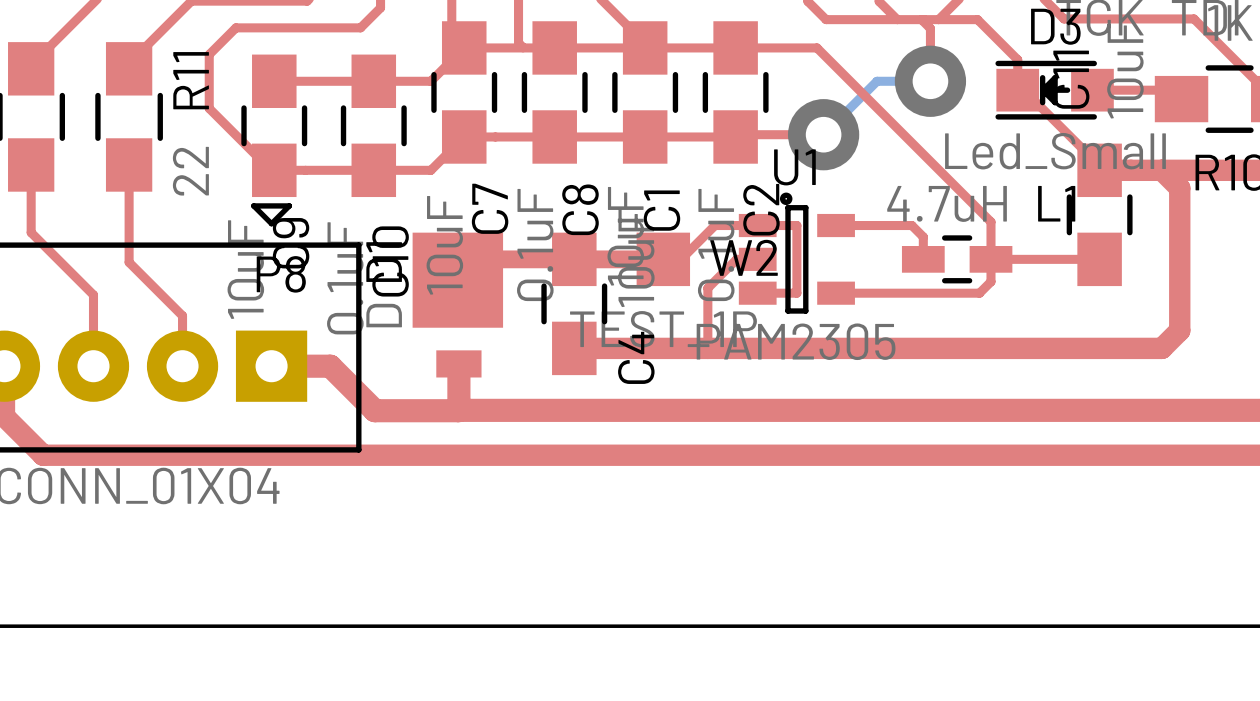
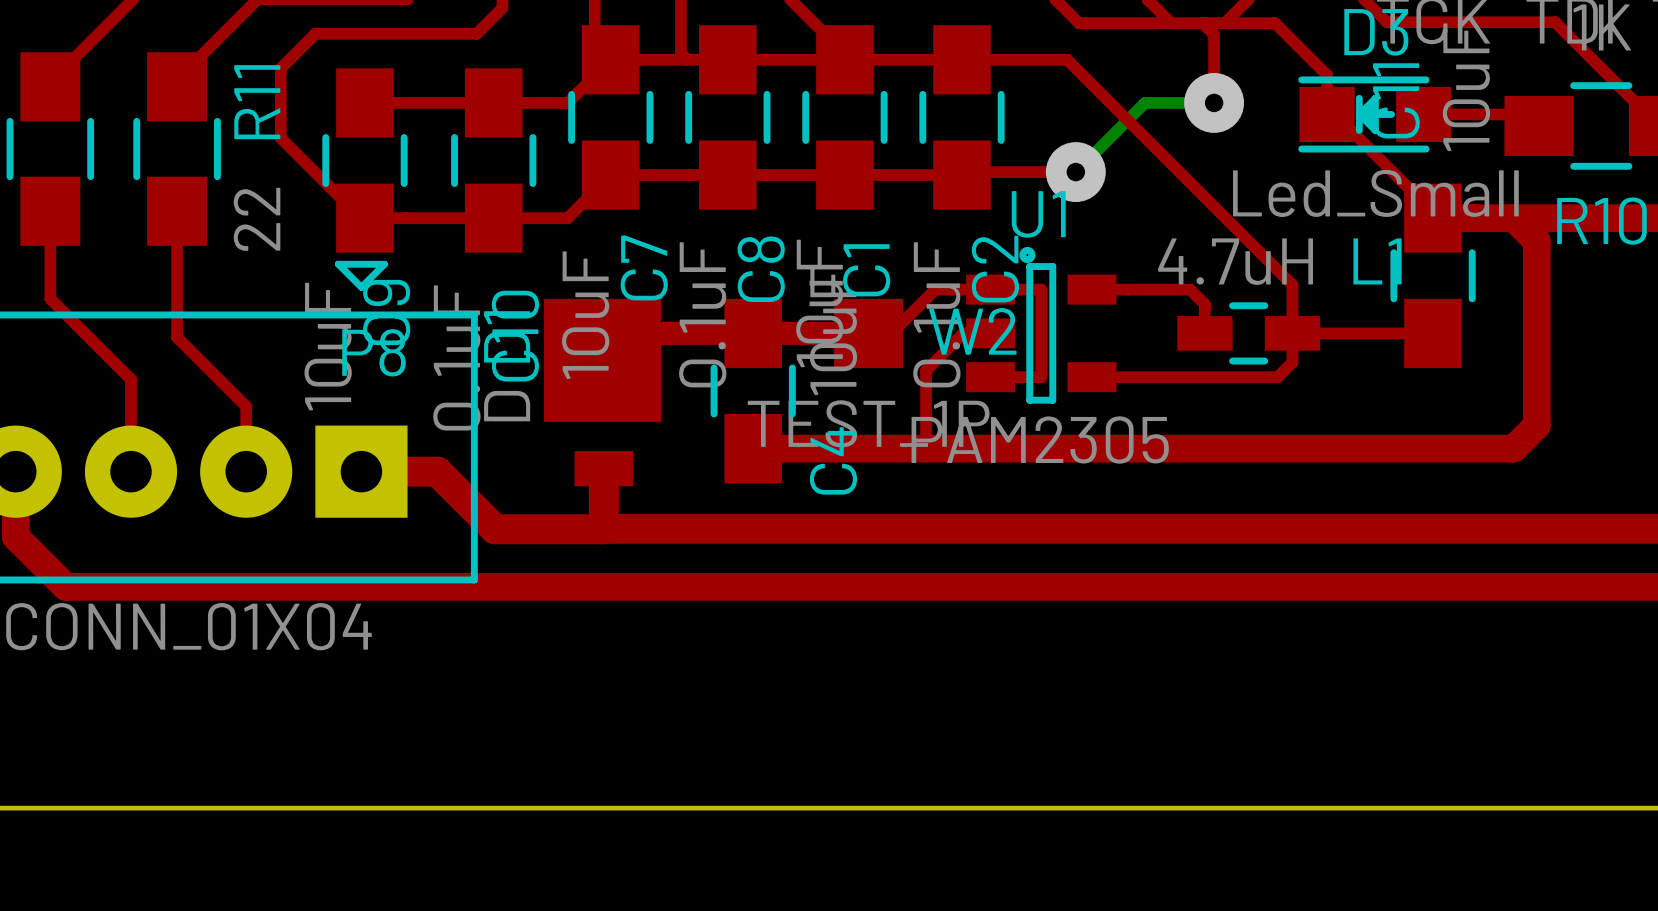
via size: [894, 45, 967, 117] -> [1184, 72, 1245, 133]
via size: [787, 99, 860, 171] -> [1045, 142, 1106, 203]

